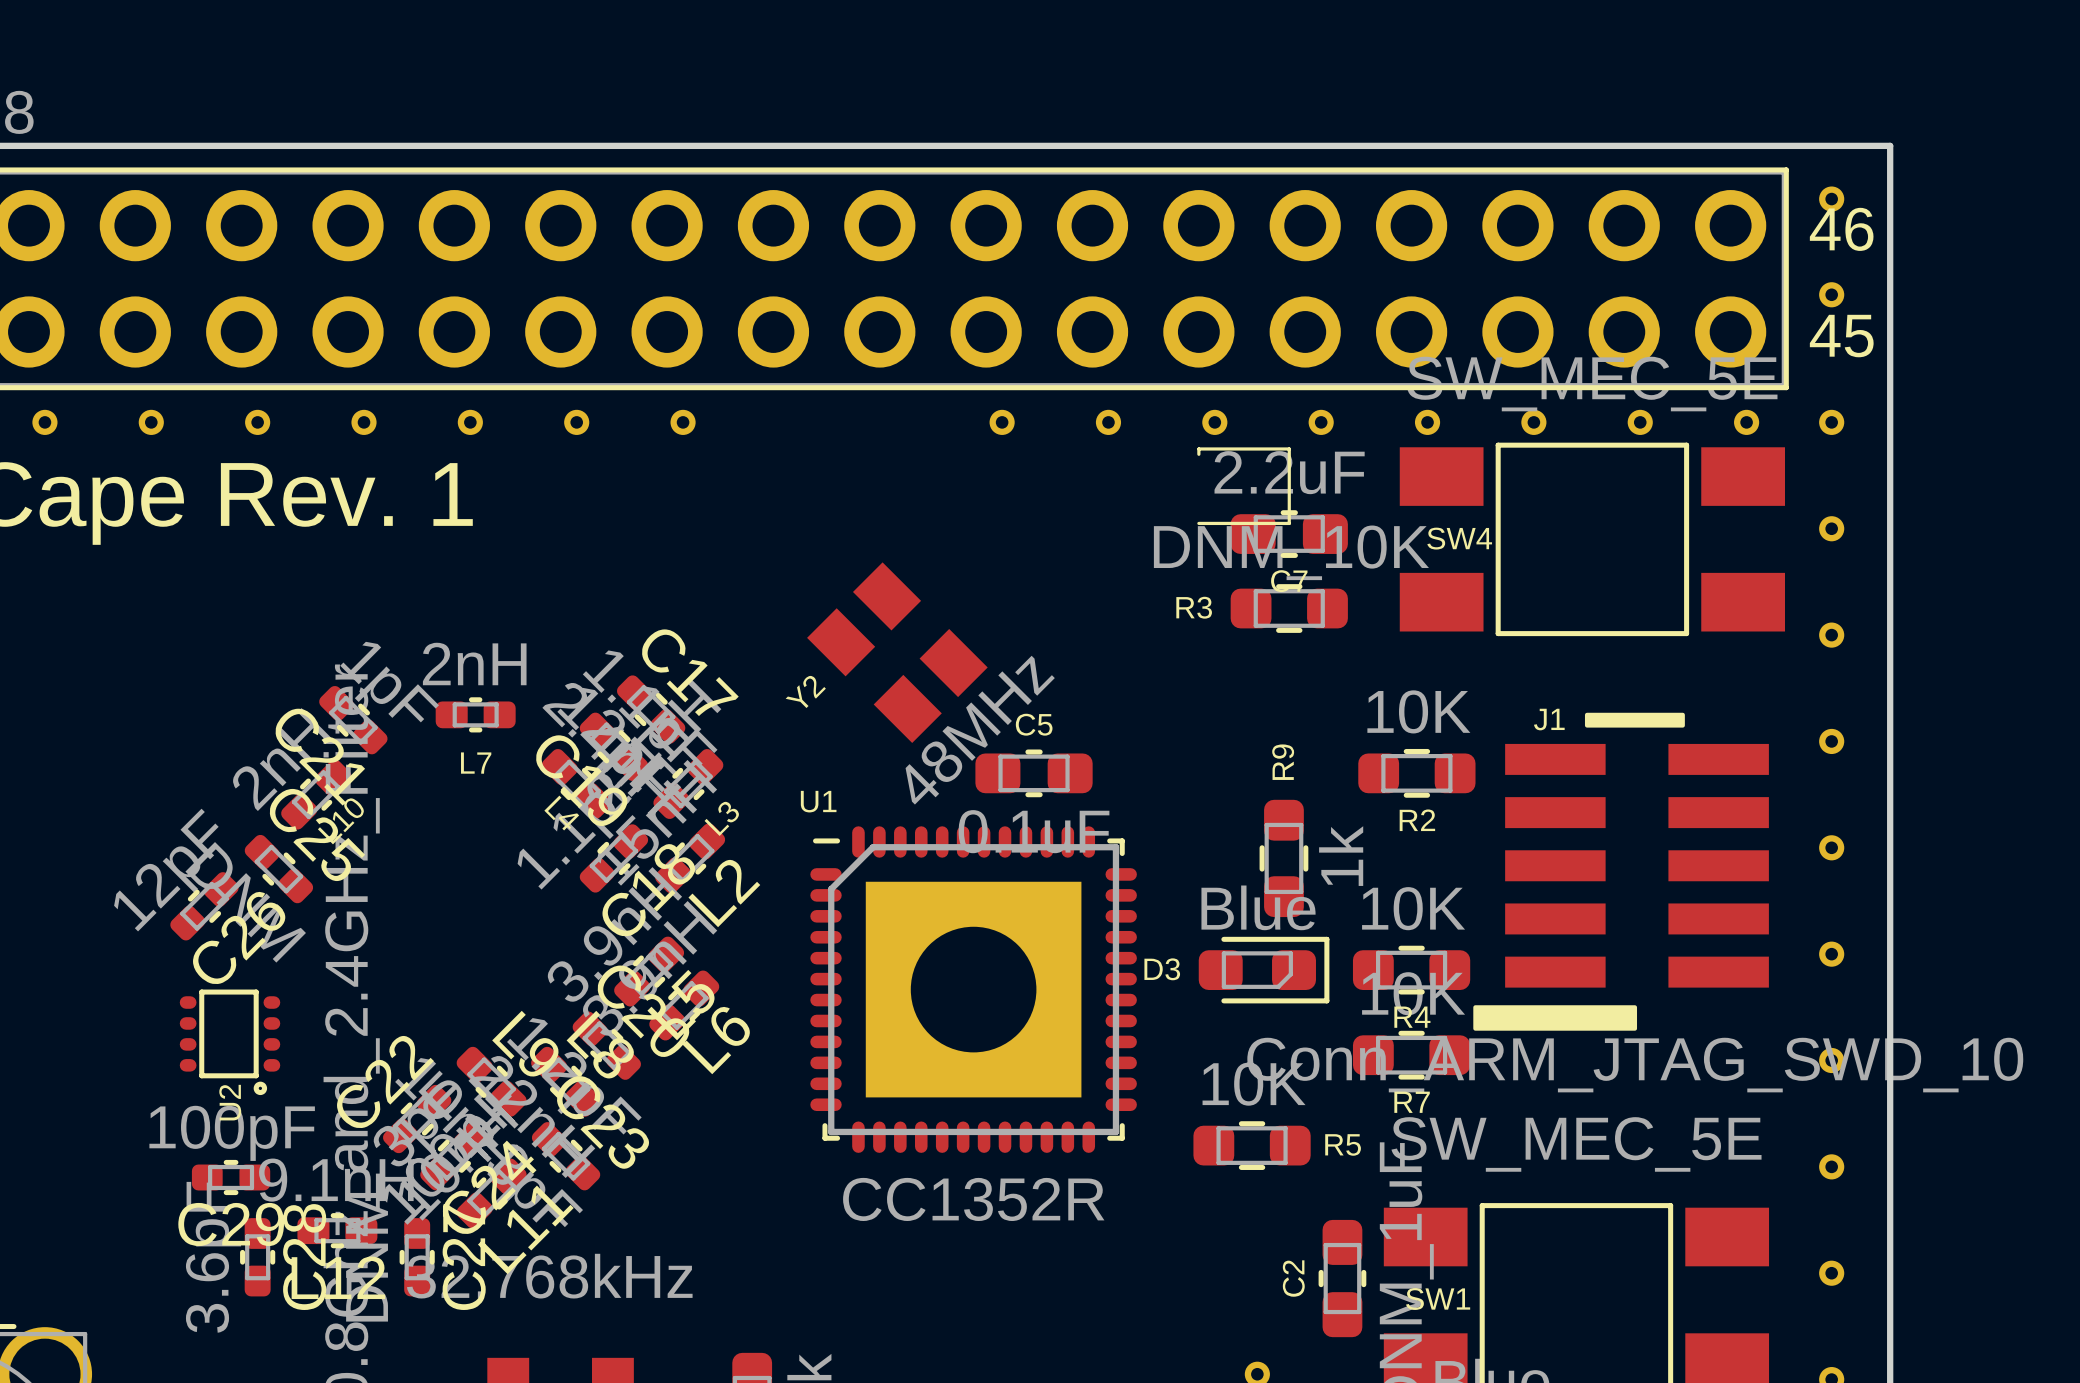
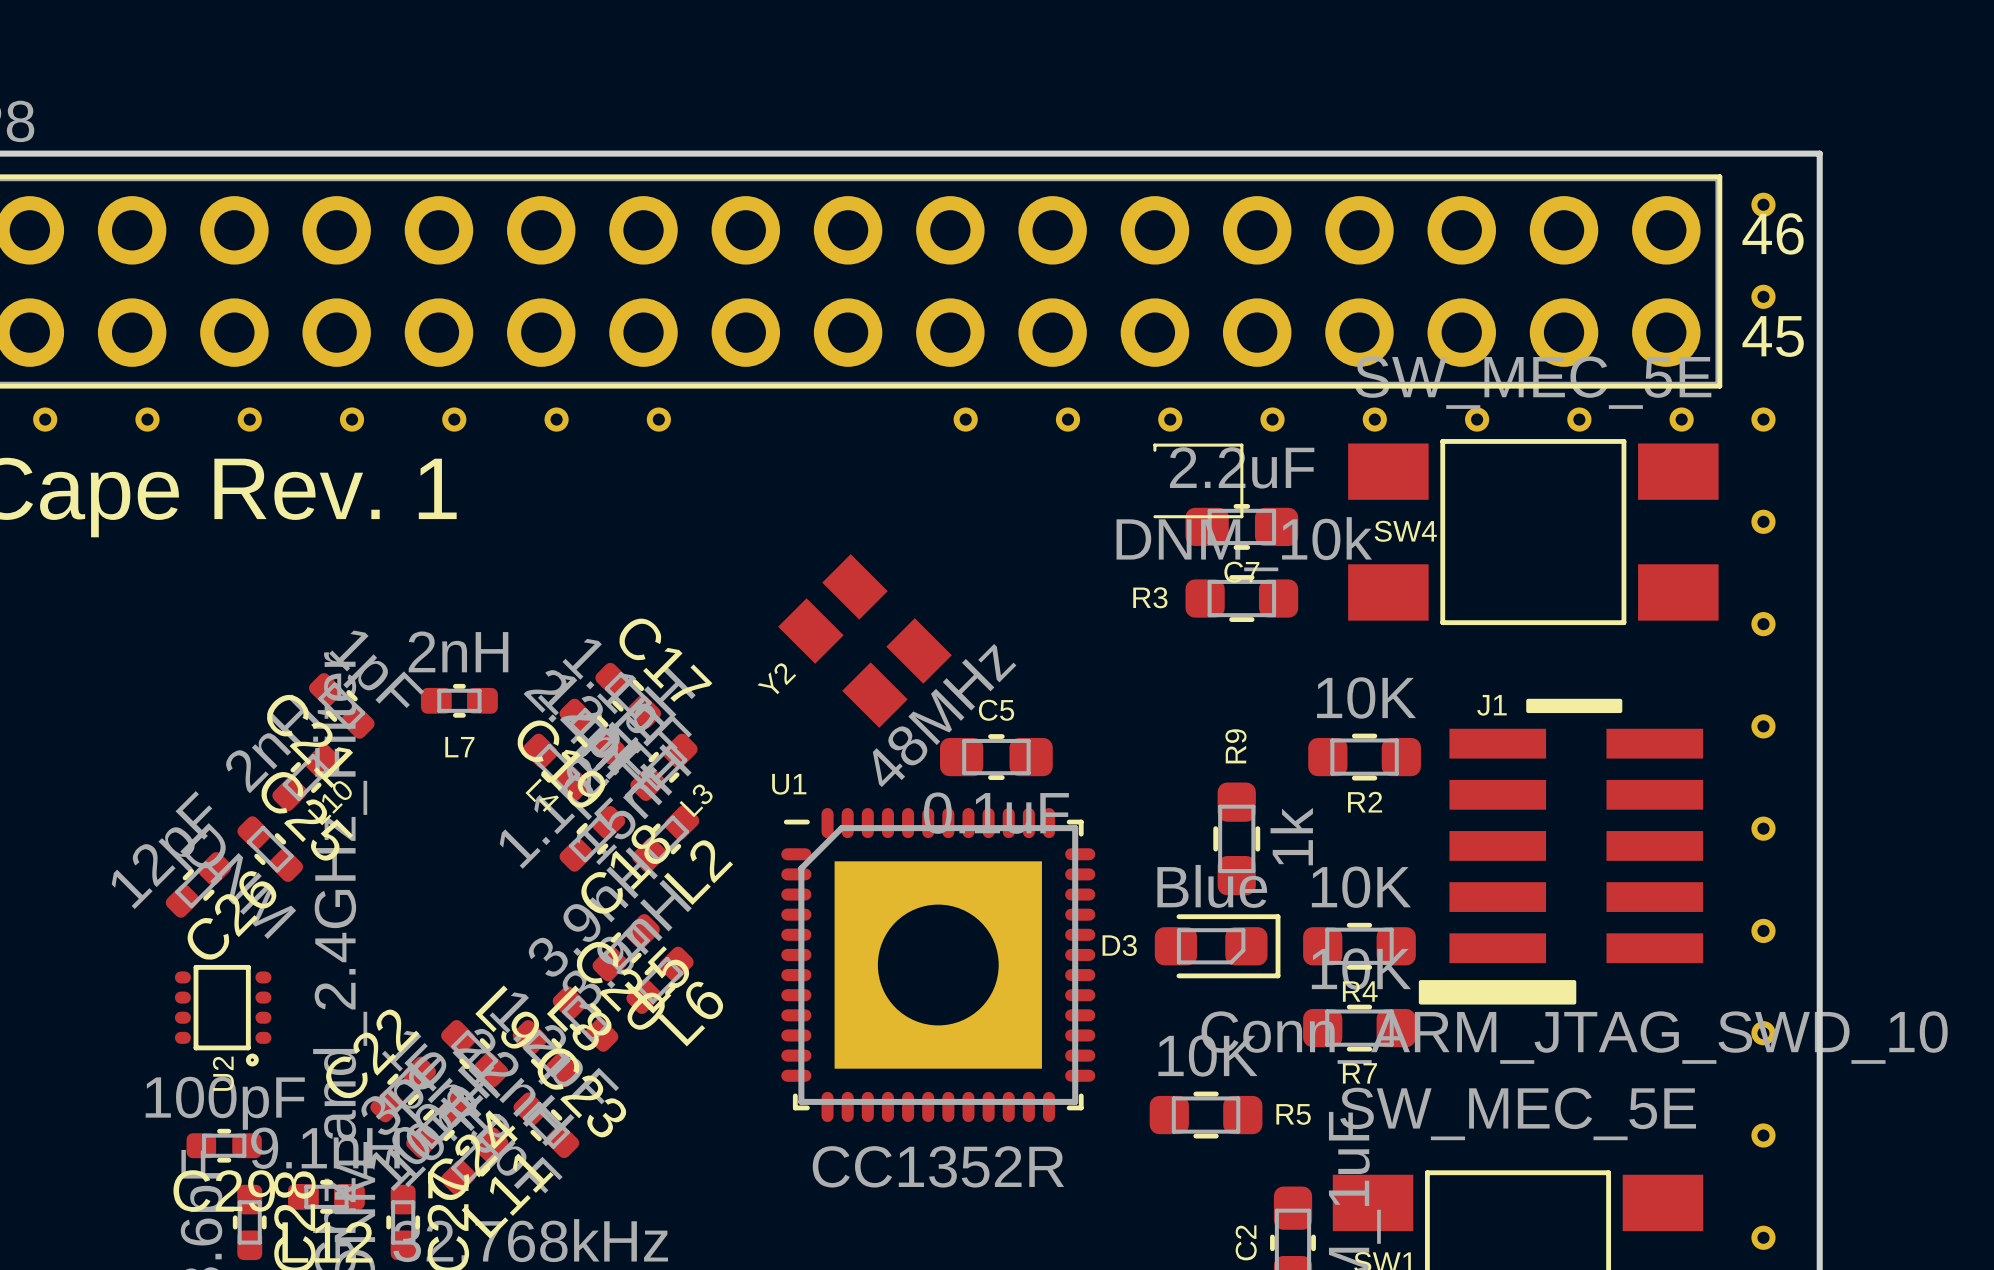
R3 value: DNM_10K (1291, 552) -> DNM_10k (1244, 544)

